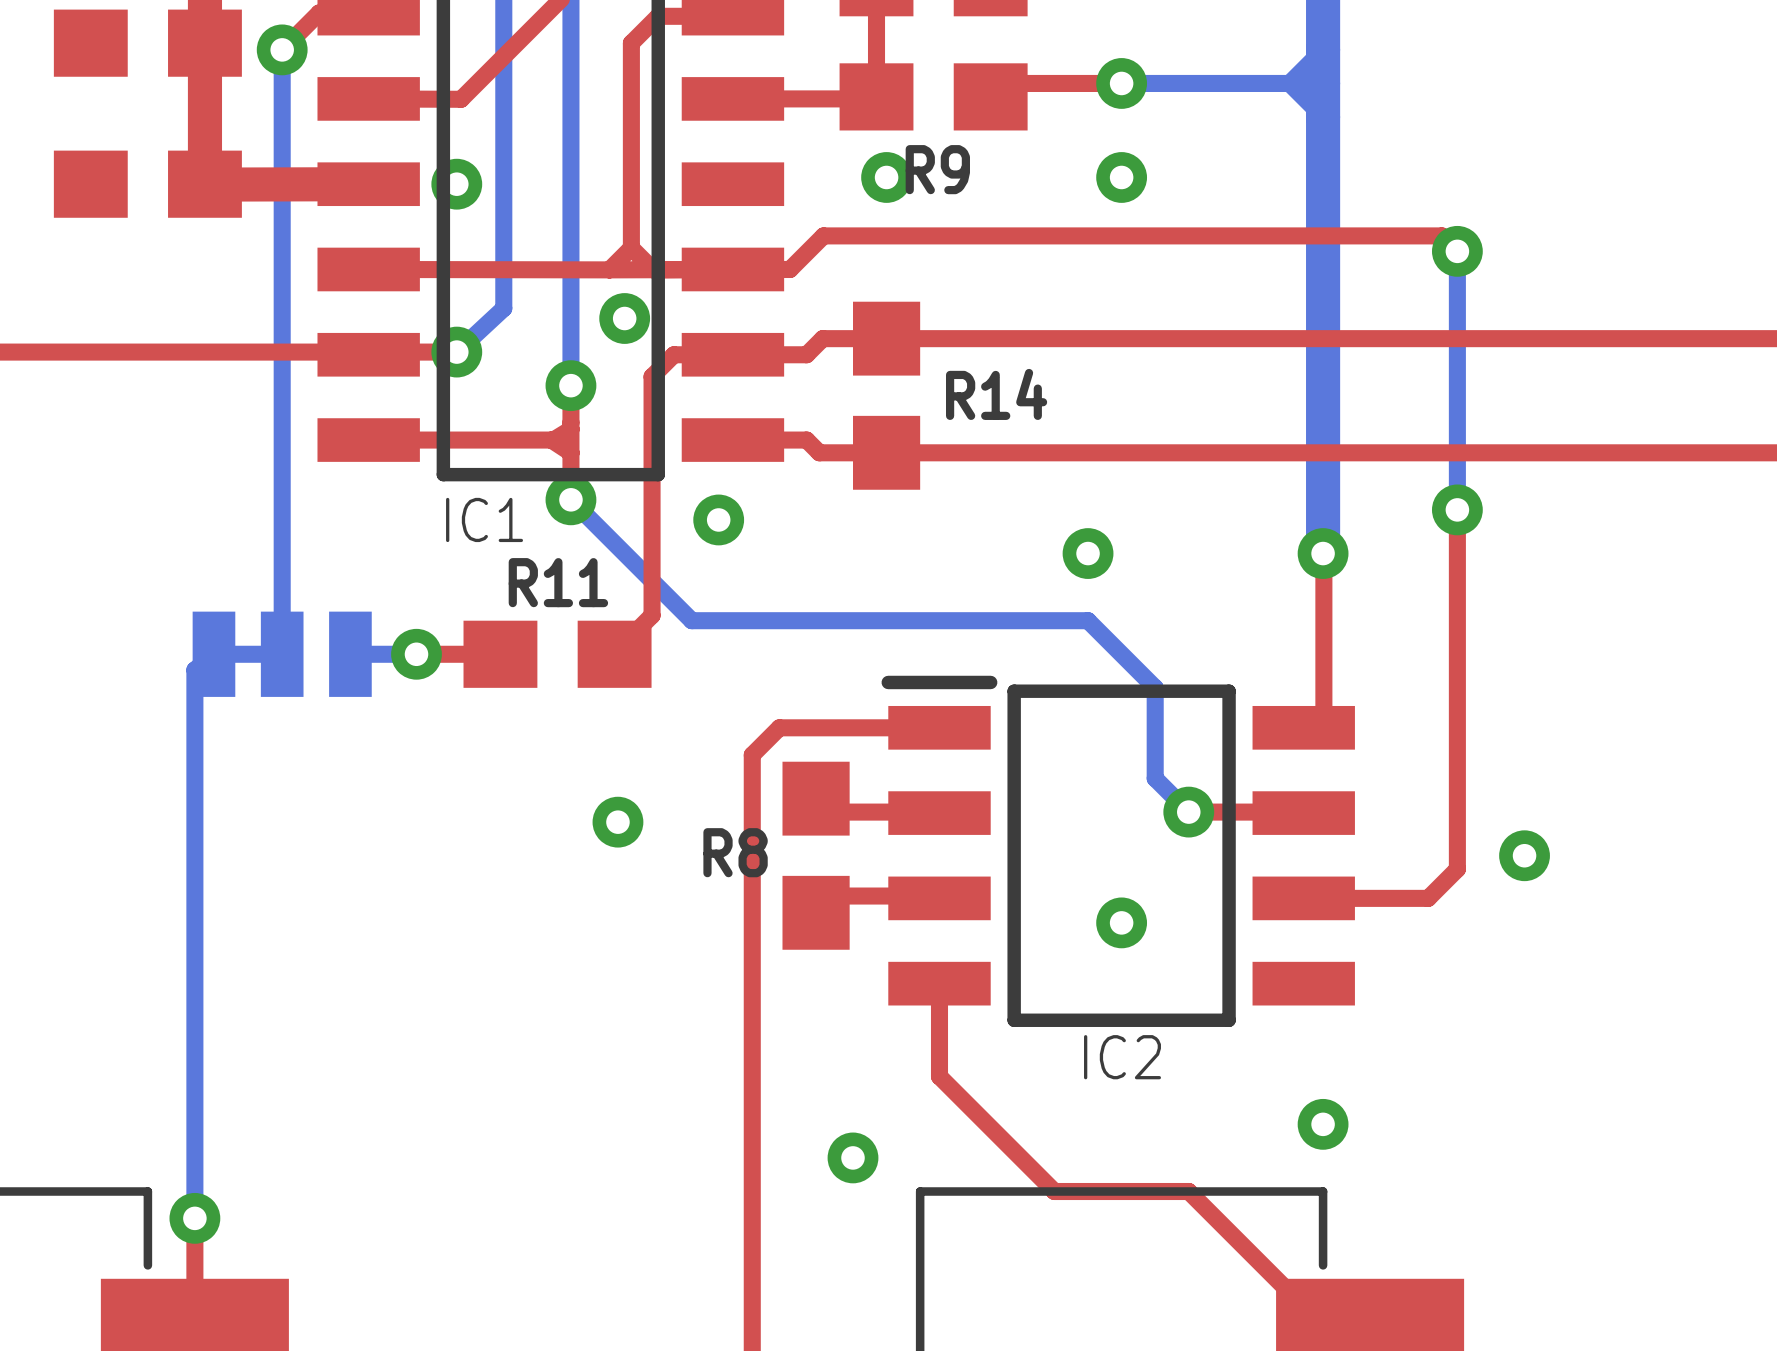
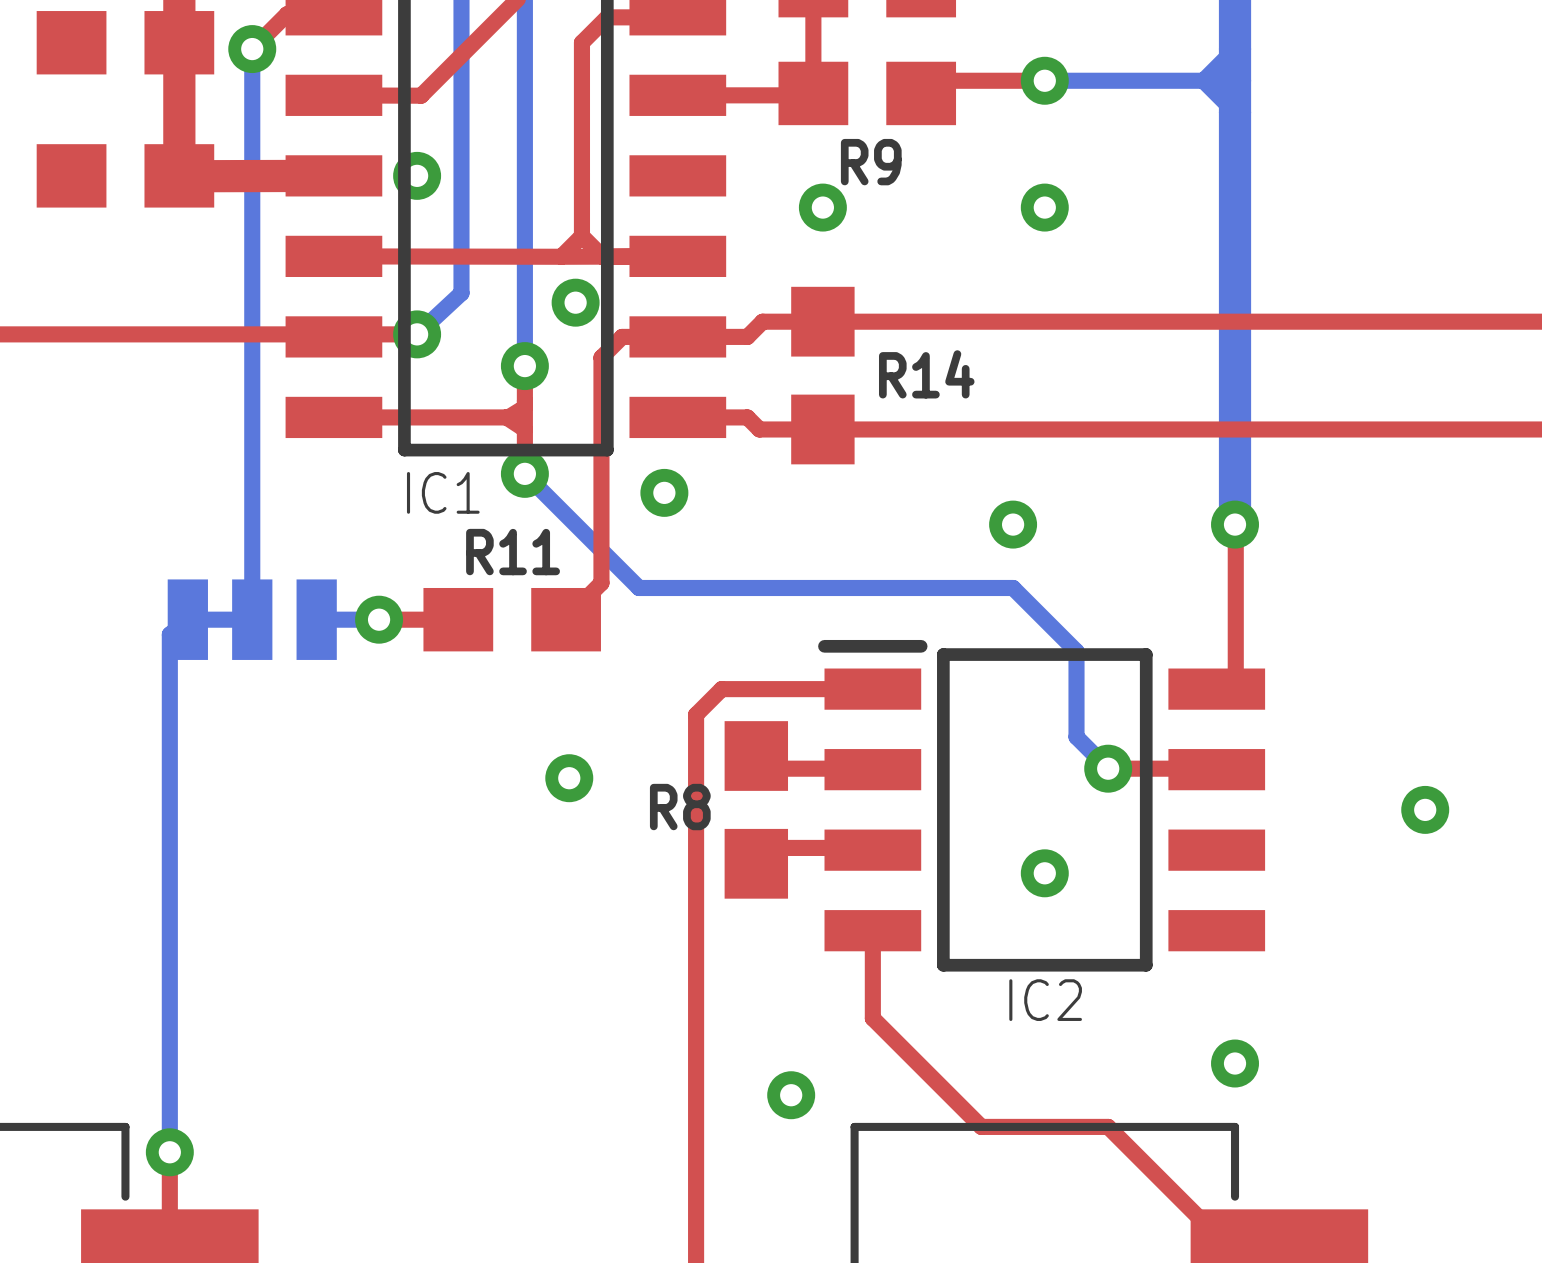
via position: (886, 177) -> (822, 207)
via position: (1121, 177) -> (1044, 207)
top track: (1457, 251) (1441, 235) (823, 235) (790, 269) (732, 269) -> none
bottom track: (1457, 251) (1457, 509) -> none
via: (1457, 251) -> none
top track: (1457, 509) (1457, 869) (1428, 898) (1303, 898) -> none
via: (1457, 509) -> none

